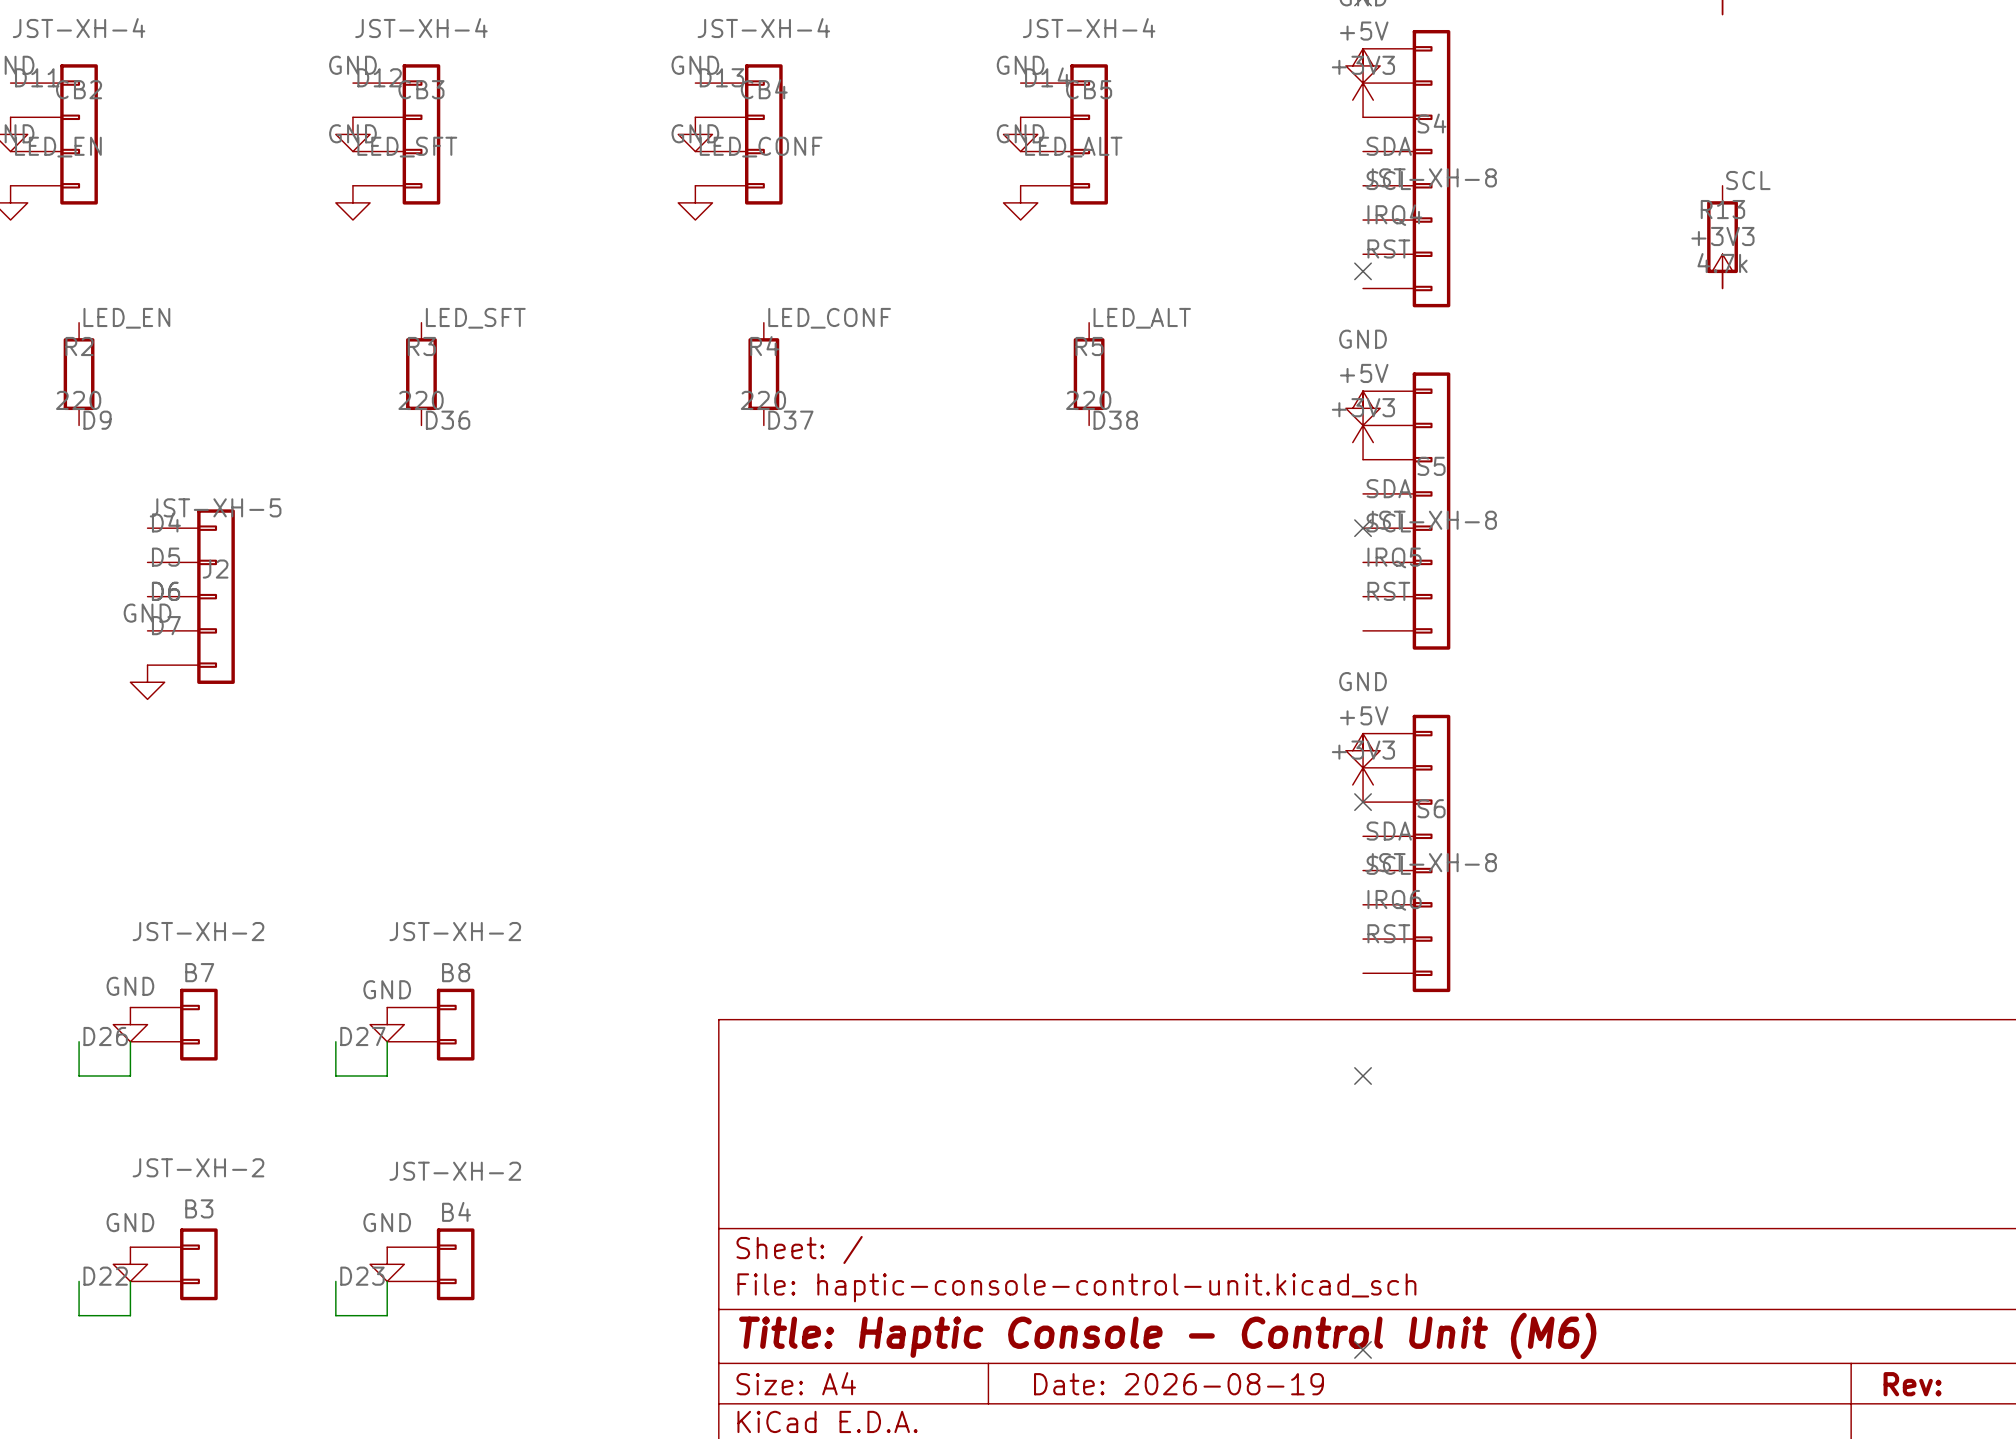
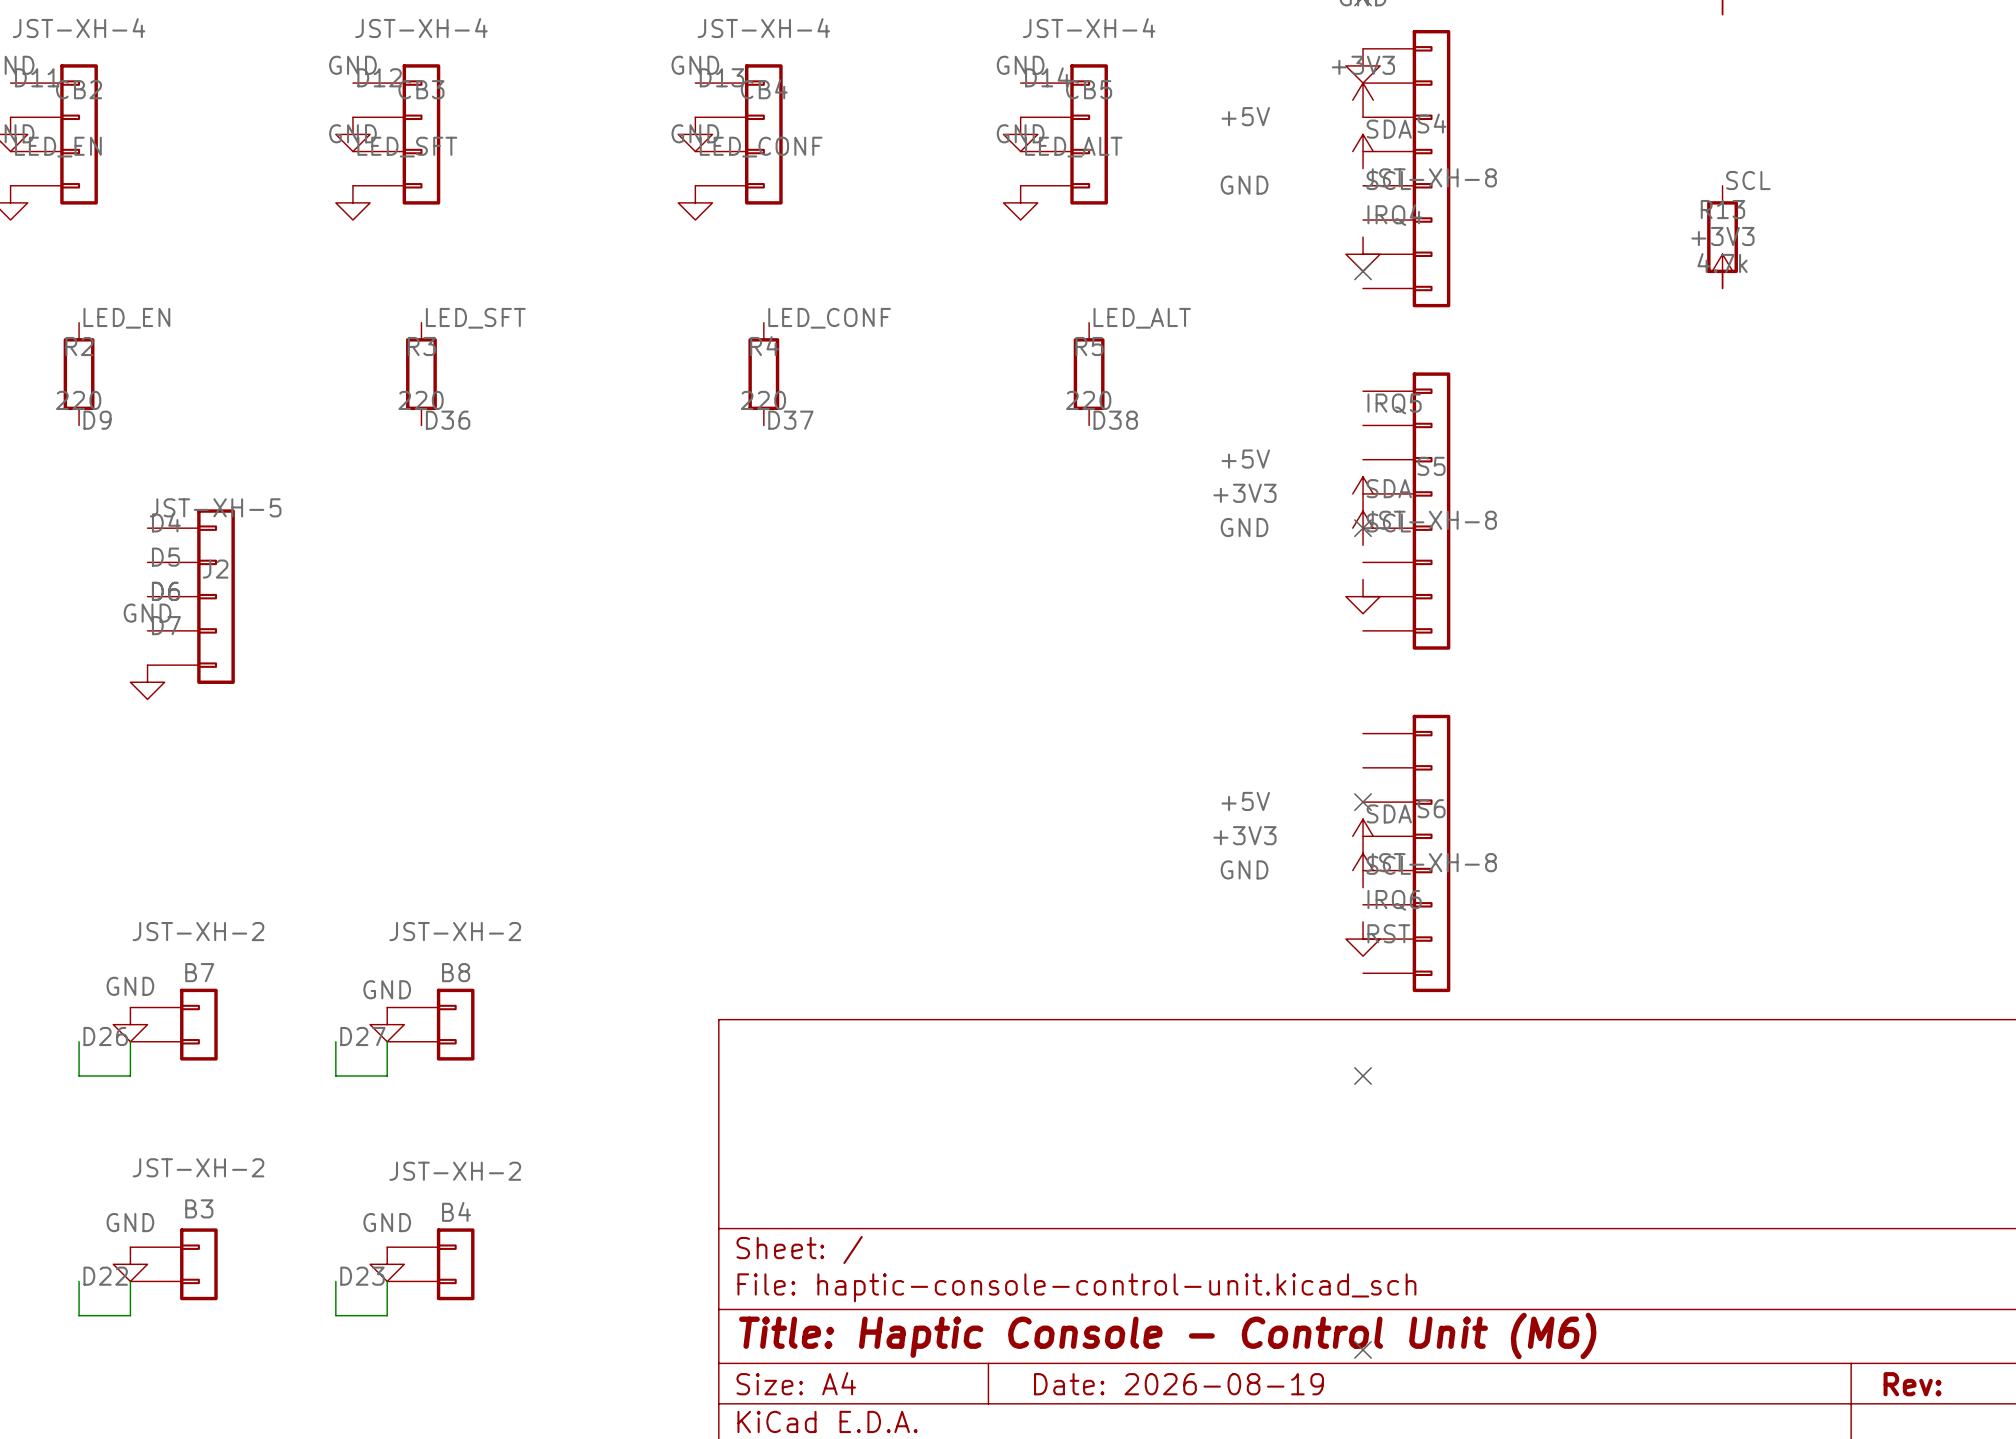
power symbol text position: +5V (1364, 31) -> +5V (1245, 116)
power symbol position: +5V (1363, 65) -> +5V (1363, 151)
label position: SDA (1389, 146) -> SDA (1389, 129)
label: RST (1388, 248) -> none
power symbol: none -> GND (1363, 254)
power symbol text position: +5V (1364, 373) -> +5V (1245, 459)
power symbol text position: +3V3 (1363, 407) -> +3V3 (1244, 493)
power symbol position: +5V (1363, 408) -> +5V (1363, 493)
power symbol: GND (1363, 408) -> none
power symbol position: +3V3 (1363, 442) -> +3V3 (1363, 528)
label position: IRQ5 (1394, 557) -> IRQ5 (1394, 403)
label: RST (1388, 591) -> none
power symbol: none -> GND (1363, 596)
power symbol text position: +5V (1364, 715) -> +5V (1245, 801)
power symbol text position: +3V3 (1363, 750) -> +3V3 (1244, 835)
power symbol position: +5V (1363, 750) -> +5V (1363, 836)
power symbol: GND (1363, 750) -> none
power symbol position: +3V3 (1363, 784) -> +3V3 (1363, 870)
label position: SDA (1389, 831) -> SDA (1389, 813)
power symbol: none -> GND (1363, 939)

